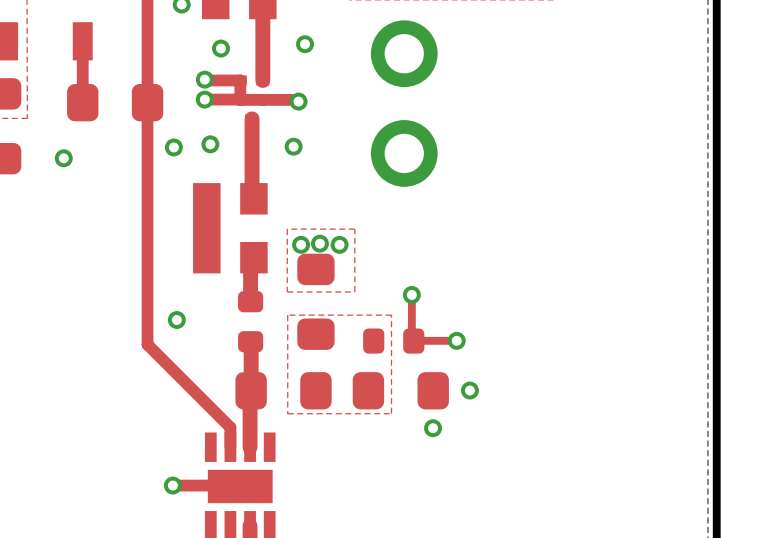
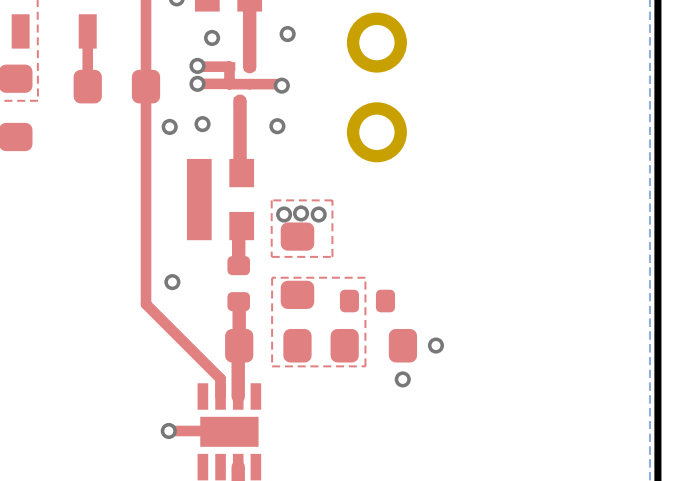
via: (63, 158) -> none
top track: (411, 294) (411, 339) (413, 341) -> none
via: (411, 294) -> none
top track: (456, 340) (414, 340) -> none
via: (456, 340) -> none

